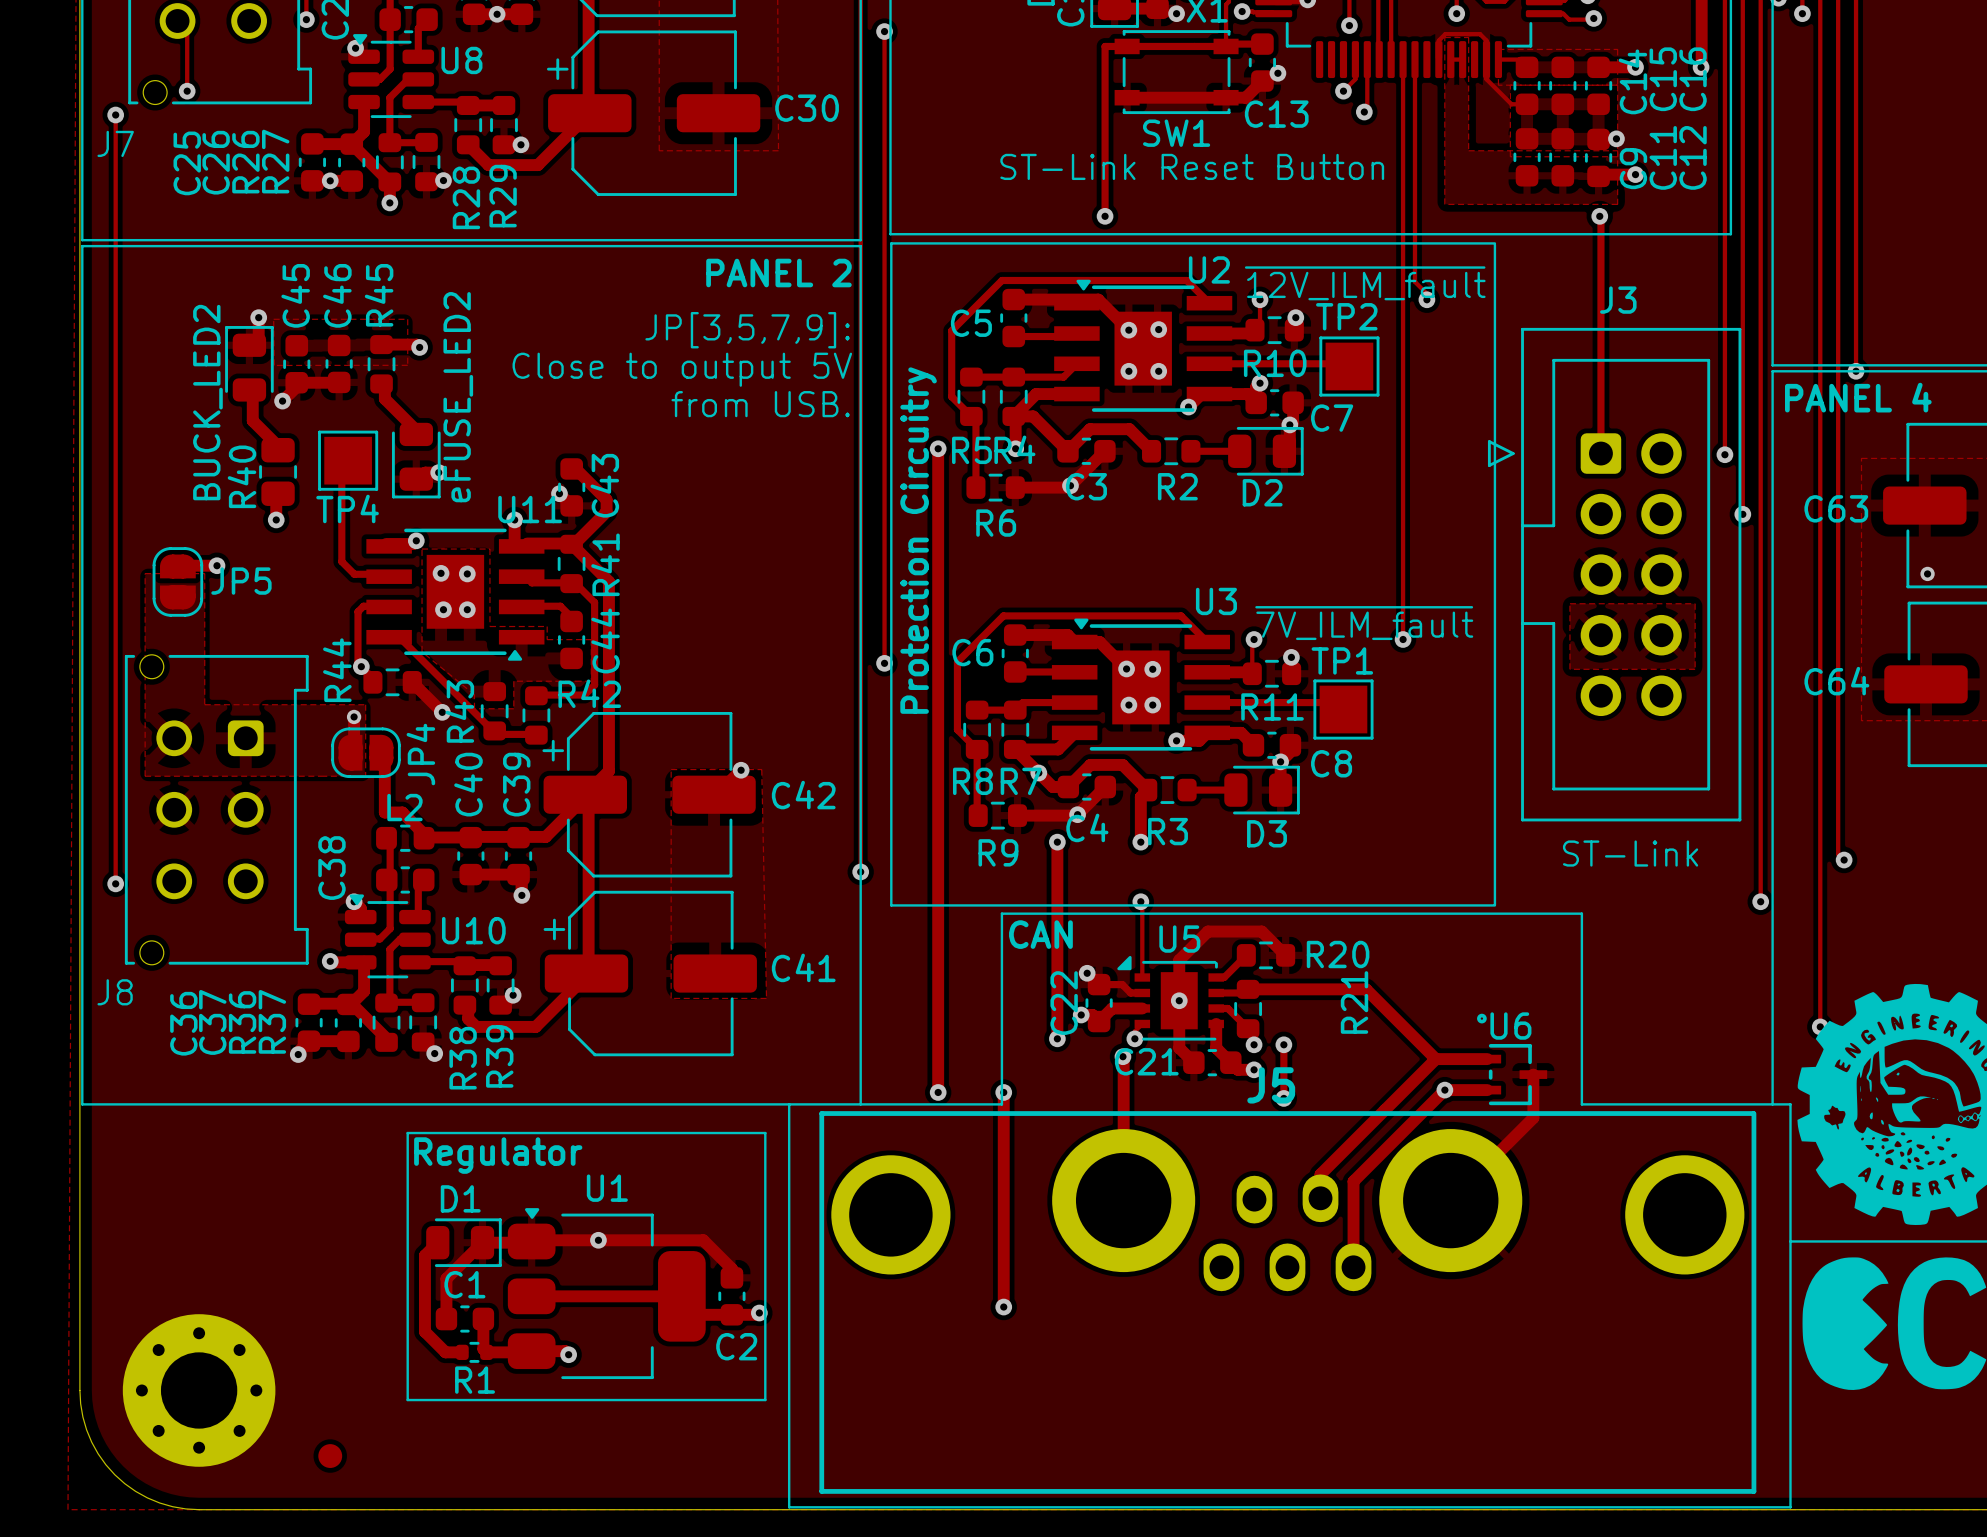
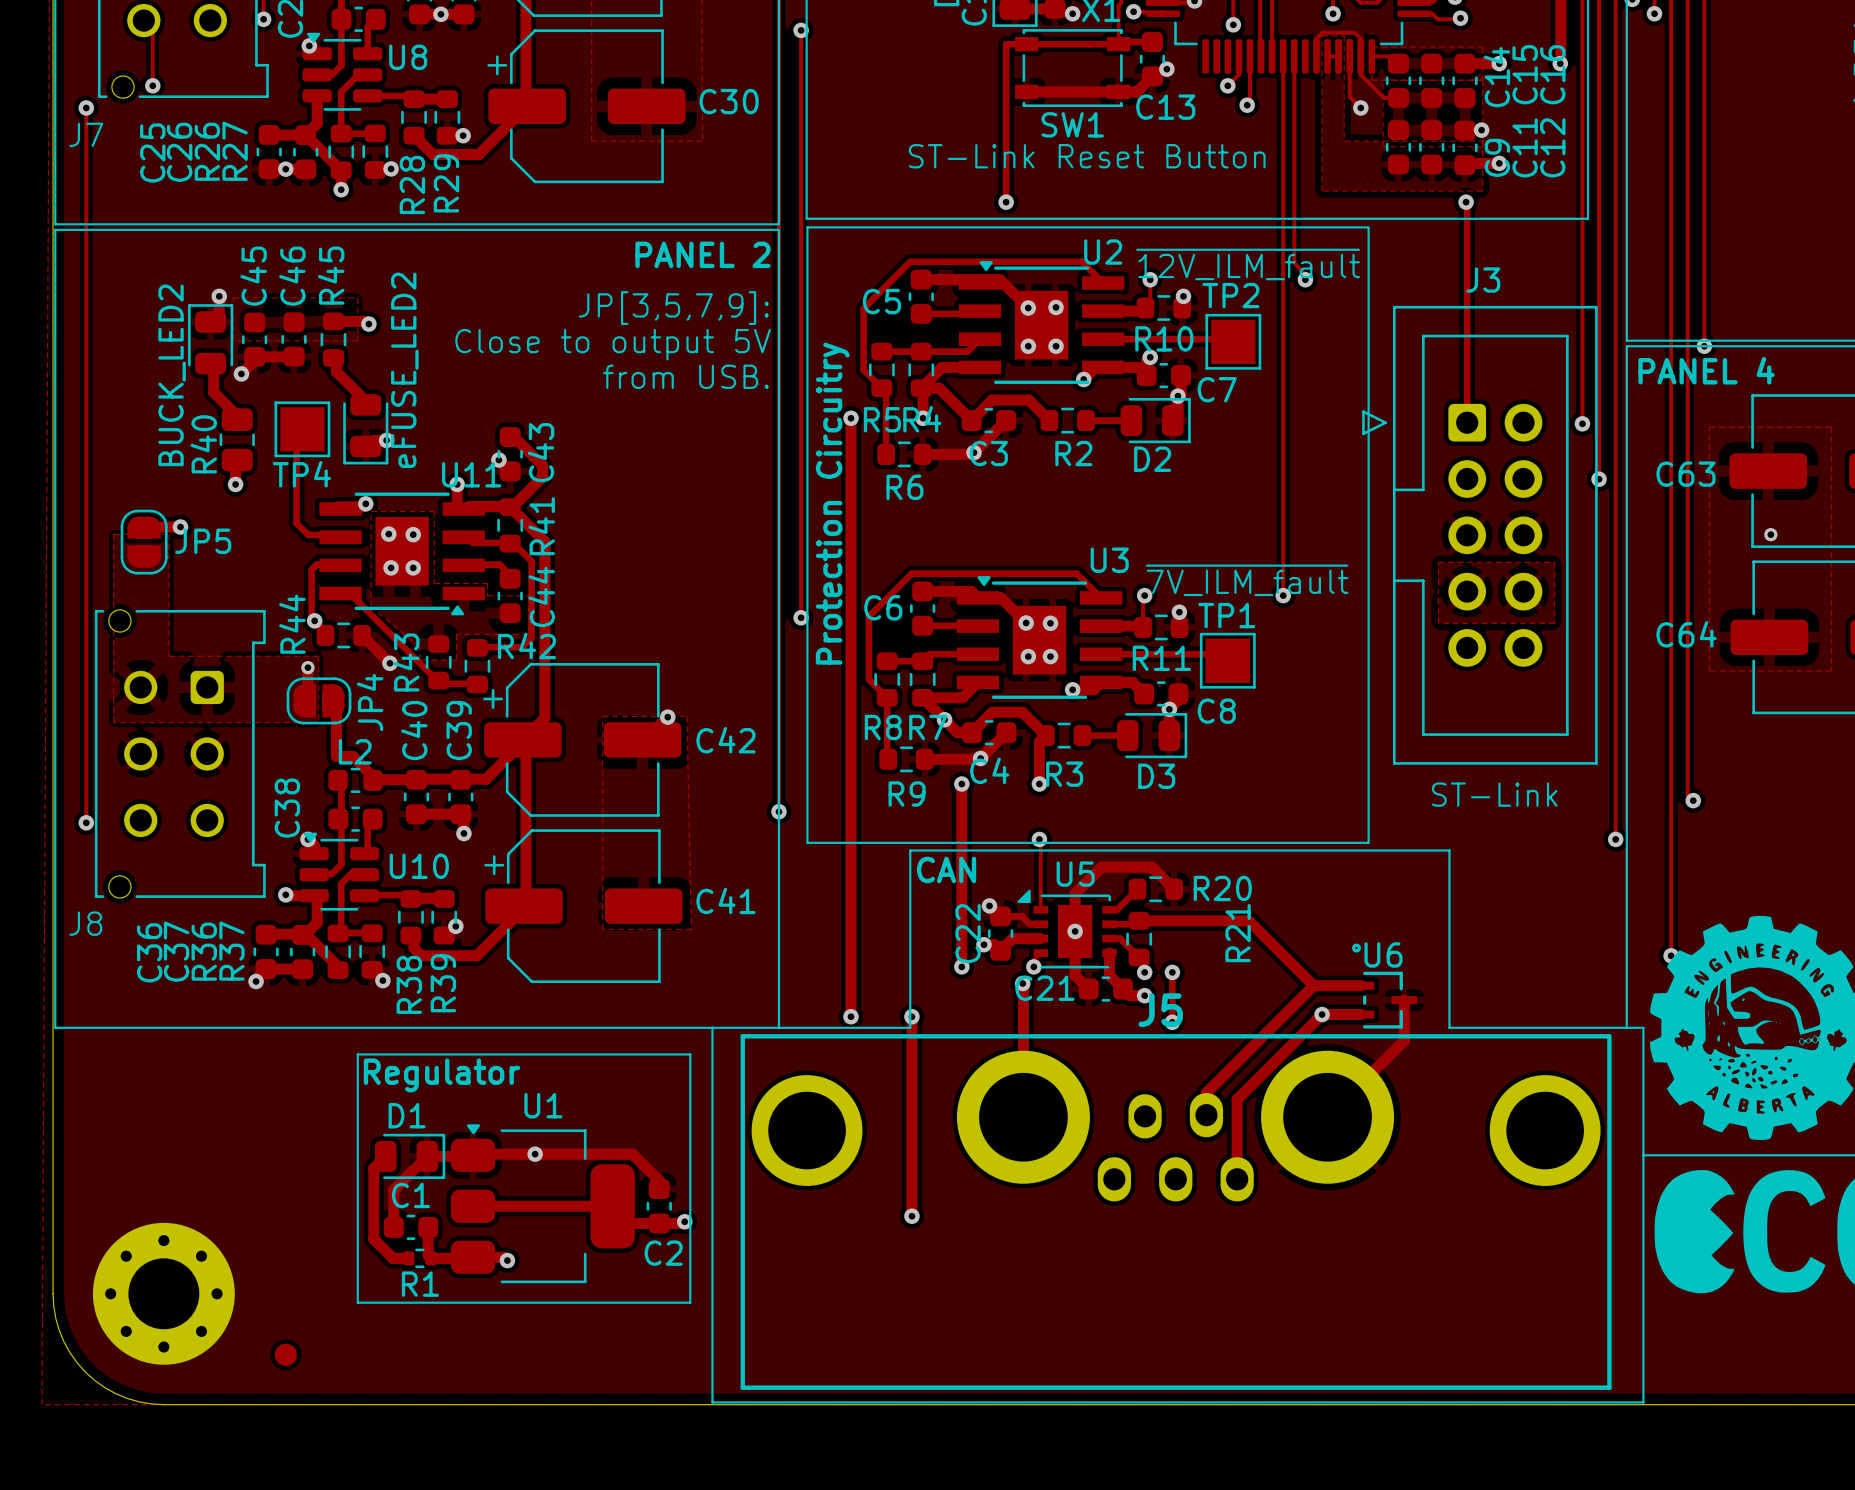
track: none -> (1349, 61) (1349, 96) (1360, 107)
via: none -> (1360, 107)

